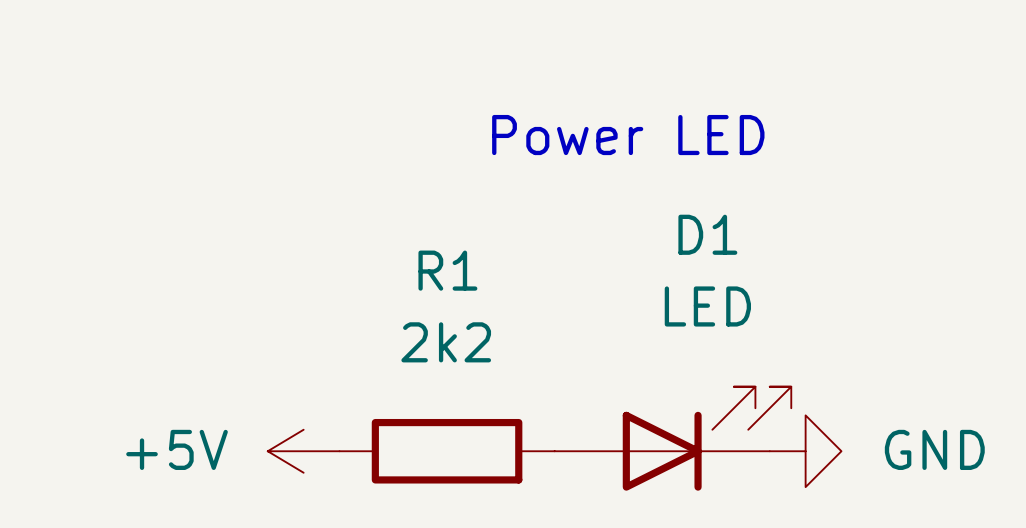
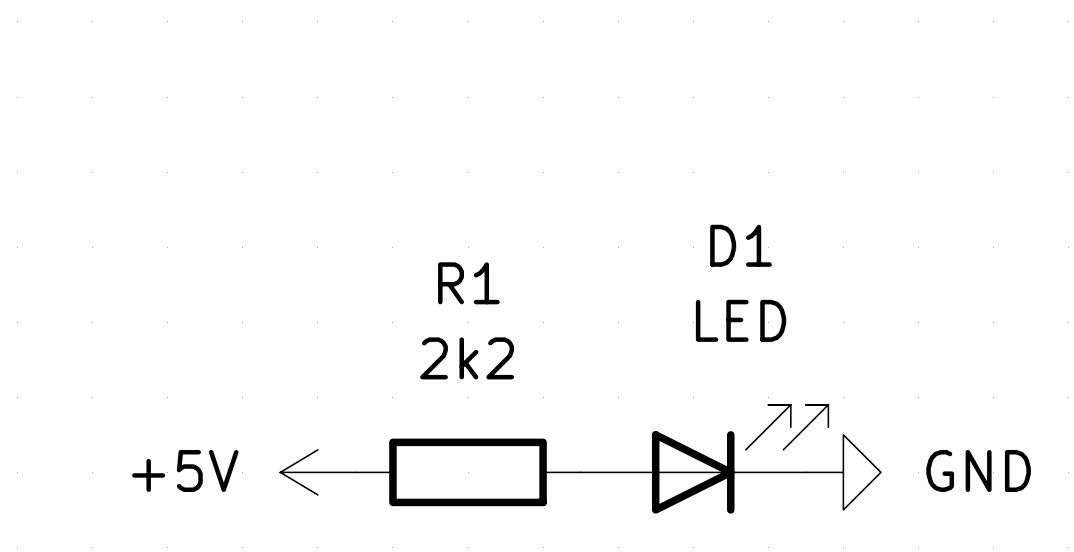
text: Power LED (628, 135) -> none

